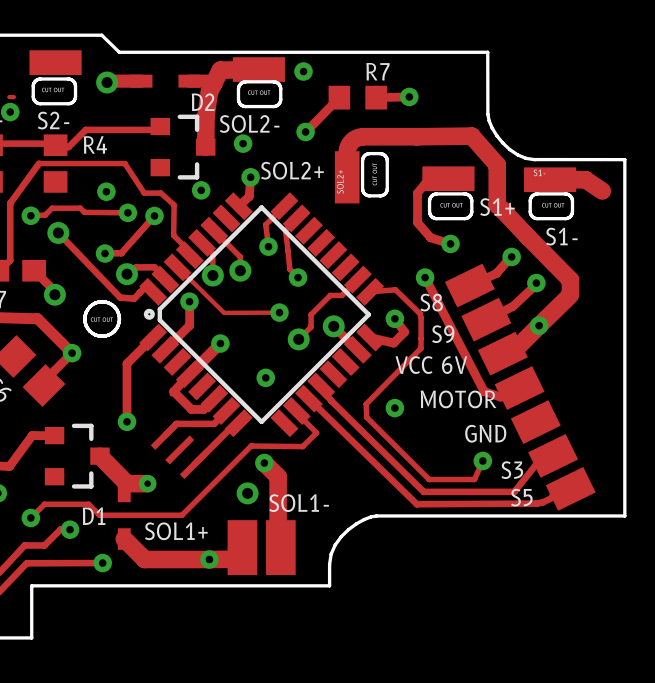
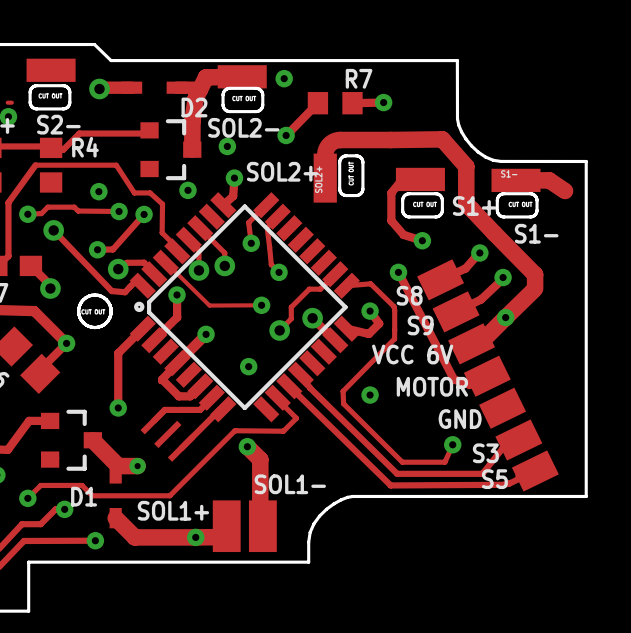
via: (247, 493) -> none

